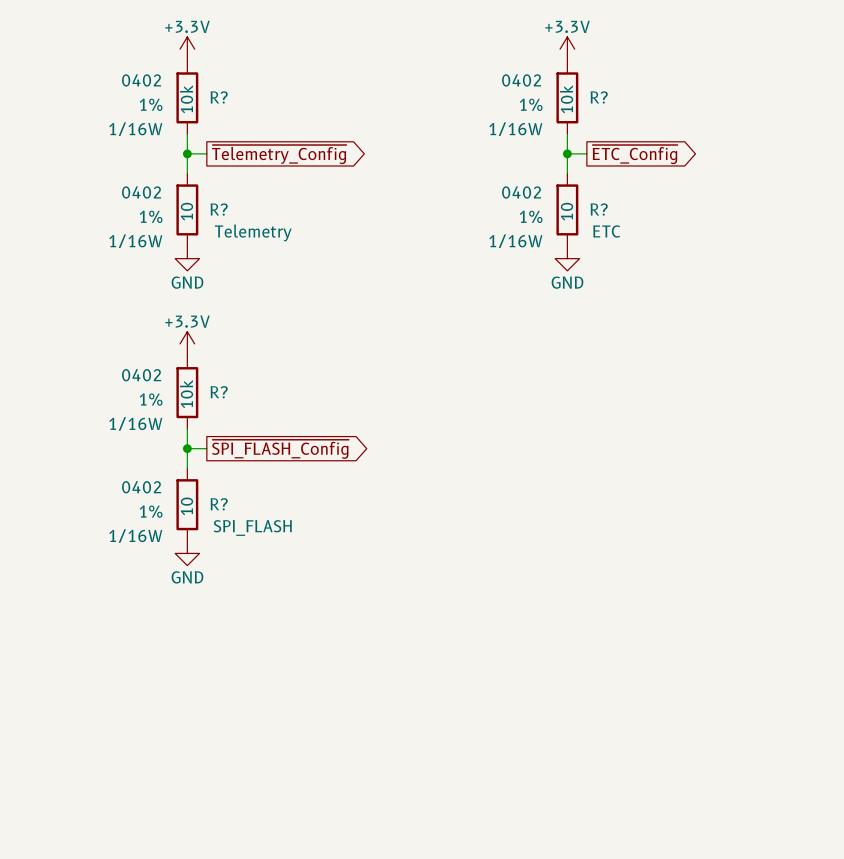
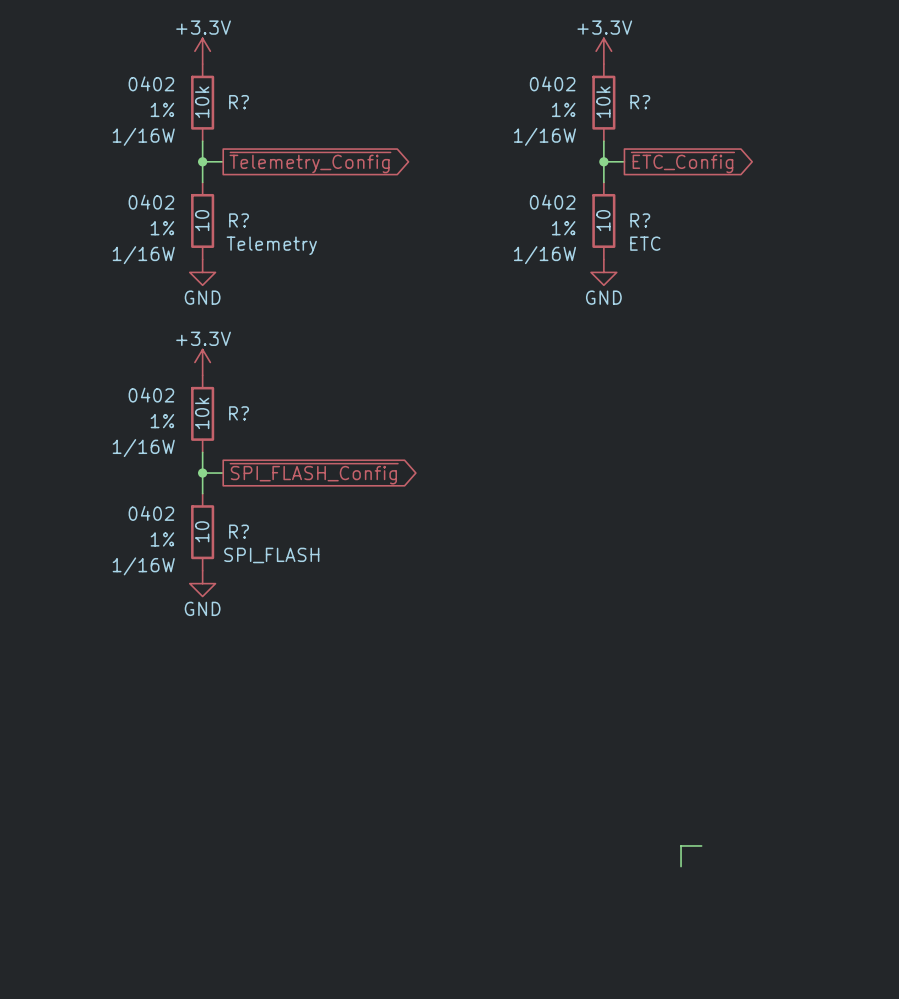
wire: none -> (701, 845) (681, 845) (681, 866)

